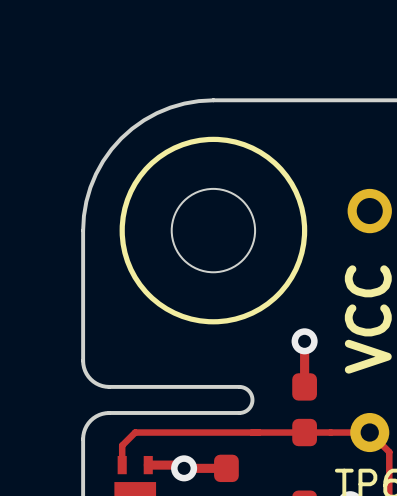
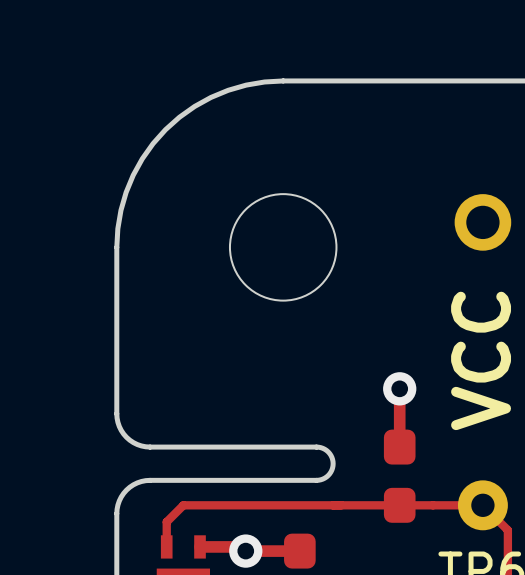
drawing: [119, 136, 308, 325] -> none

